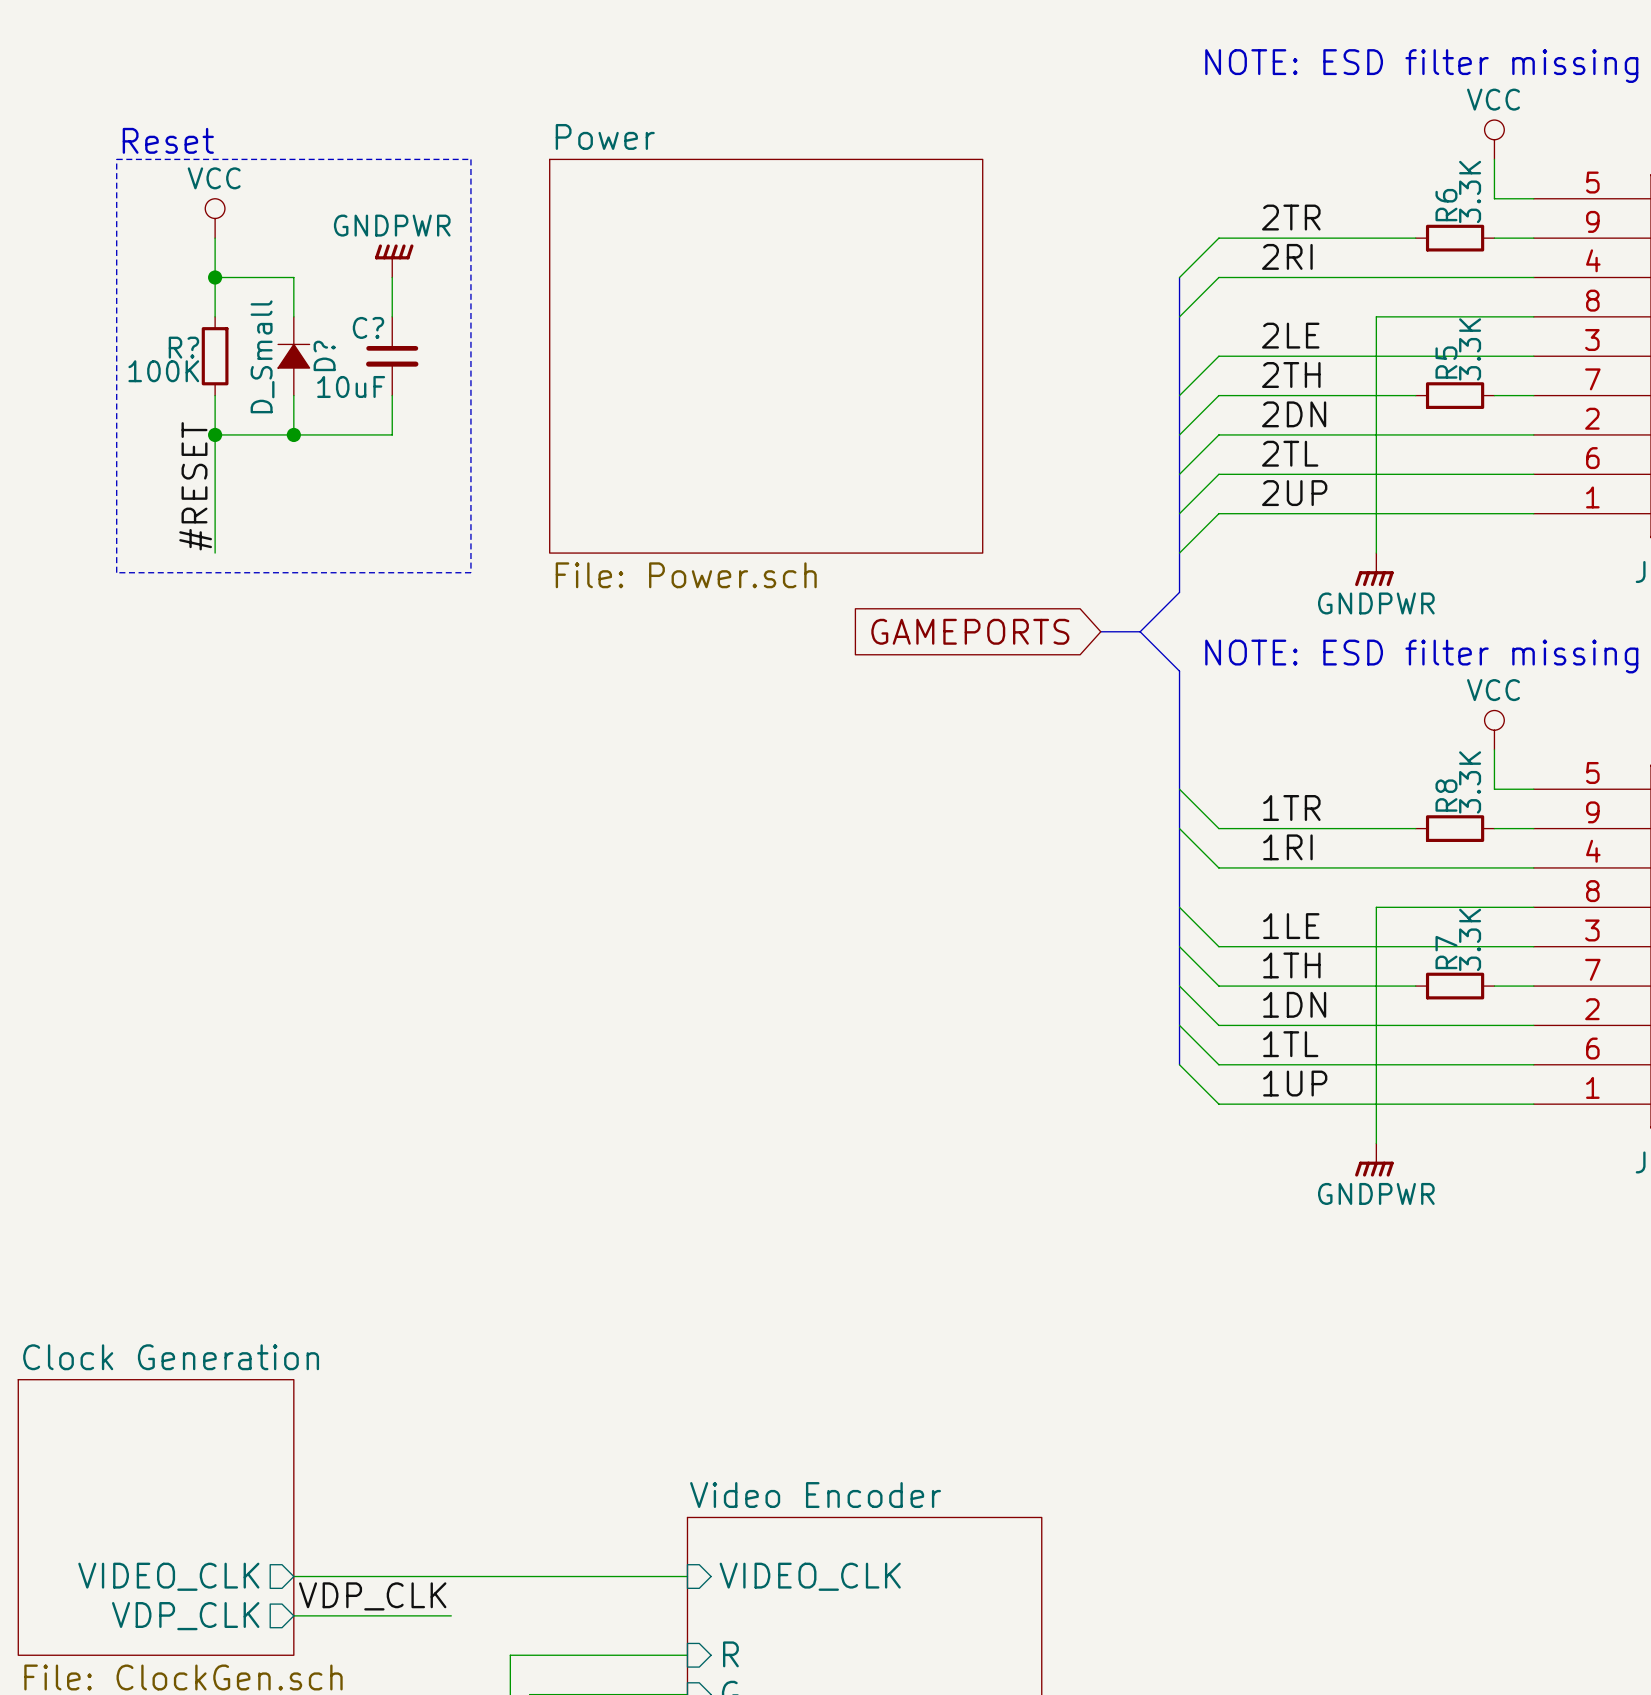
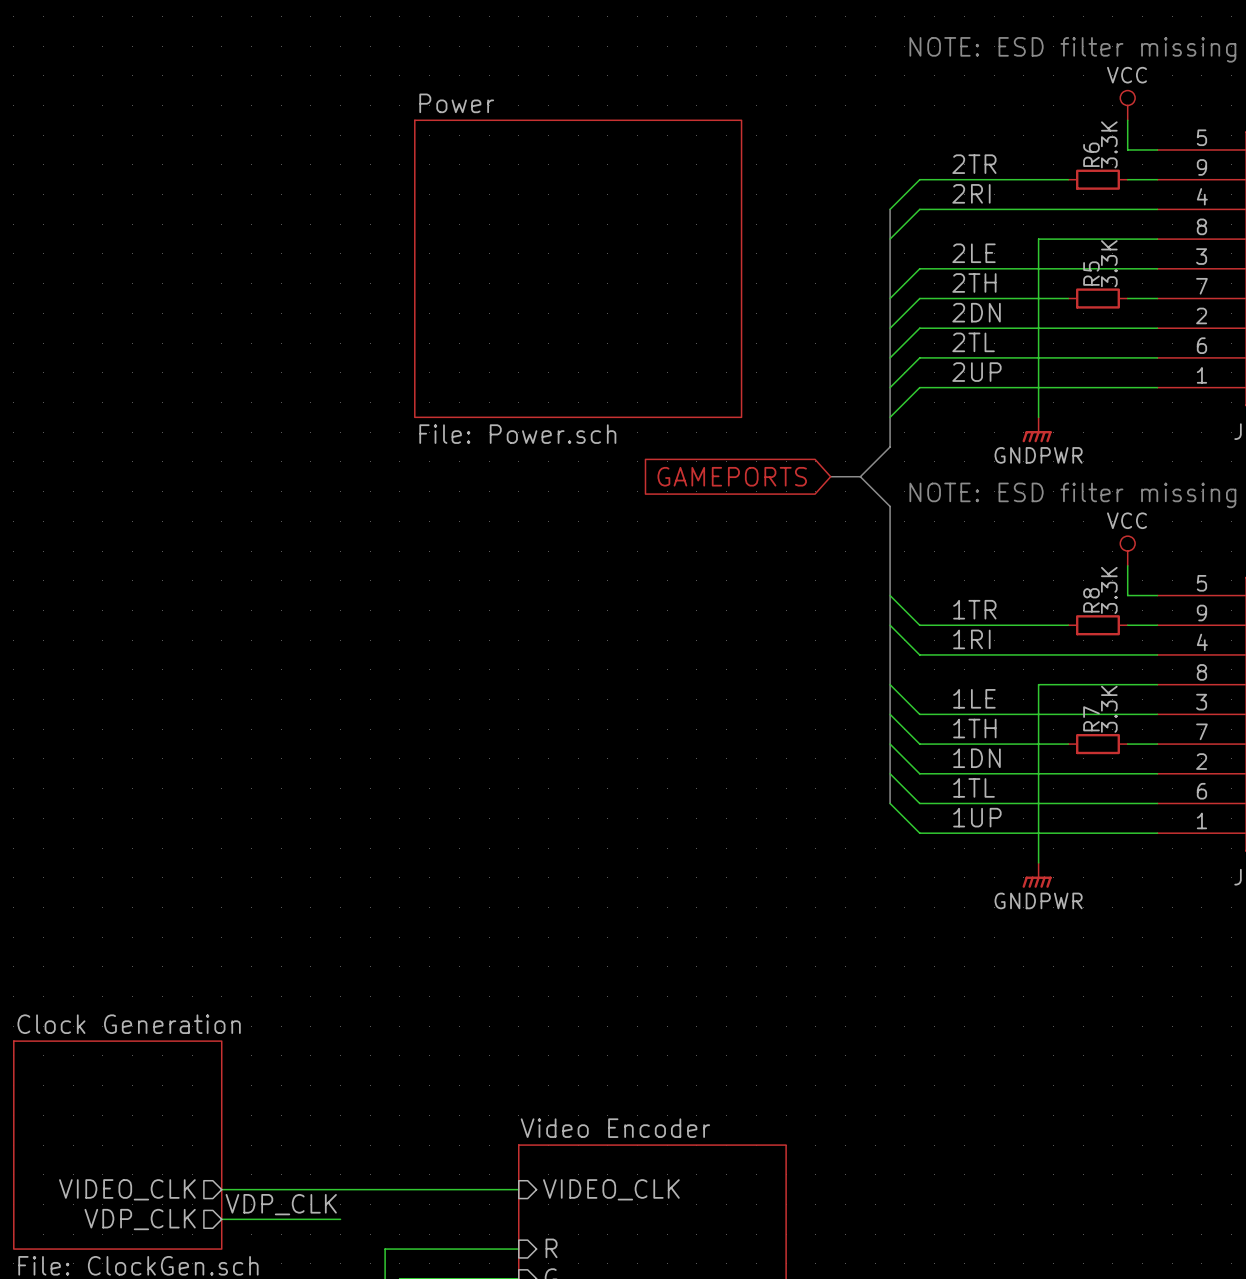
text: Reset (168, 140) -> none
line: (116, 159) (470, 159) (470, 572) (116, 572) (116, 159) -> none
power symbol: VCC (215, 218) -> none
wire: (215, 238) (215, 316) -> none
power symbol: GNDPWR (394, 260) -> none
wire: (215, 277) (293, 277) (293, 316) -> none
junction: (215, 277) -> none
wire: (392, 277) (392, 316) -> none
R?: 100K (215, 356) -> none
D?: D_Small (293, 356) -> none
C?: 10uF (392, 356) -> none
wire: (215, 395) (215, 553) -> none
wire: (293, 395) (293, 434) -> none
wire: (392, 395) (392, 434) (215, 434) -> none
junction: (215, 434) -> none
junction: (293, 434) -> none
label: #RESET (195, 486) -> none

